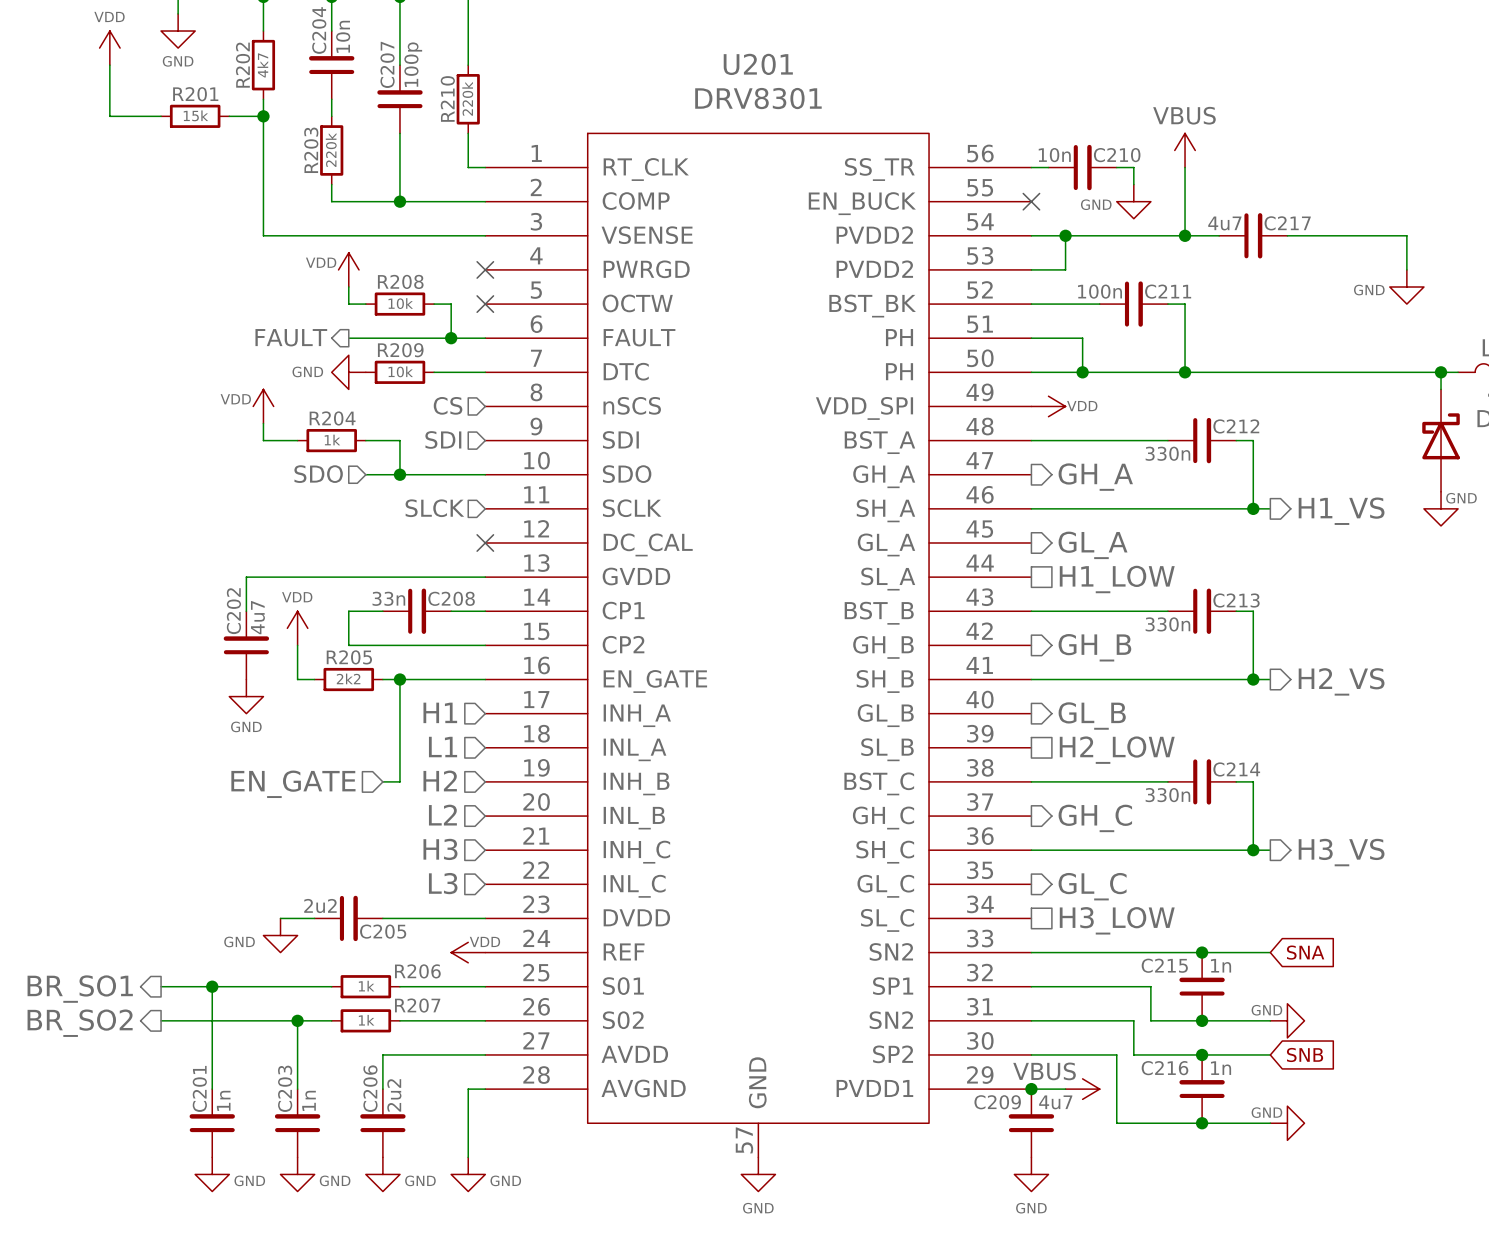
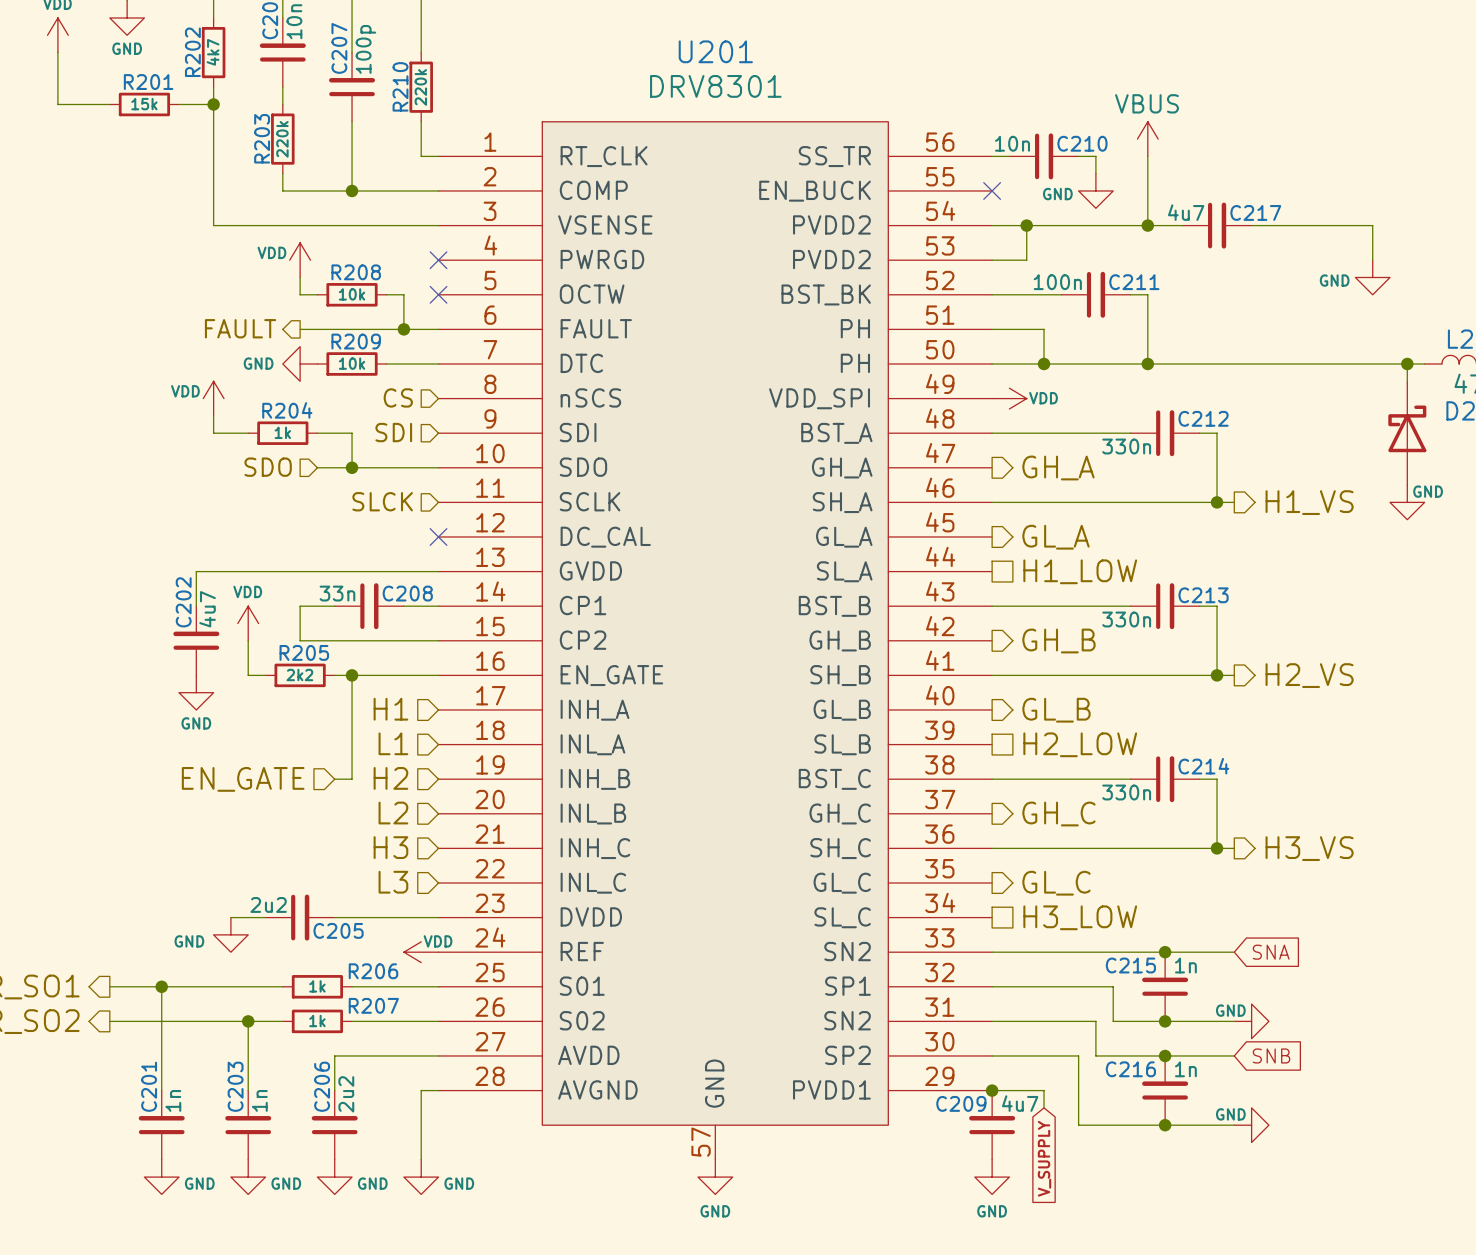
wire: none -> (1026, 1090) (1044, 1090) (1044, 1107)
power symbol: VBUS (1082, 1089) -> none
global label: none -> V_SUPPLY (1044, 1158)

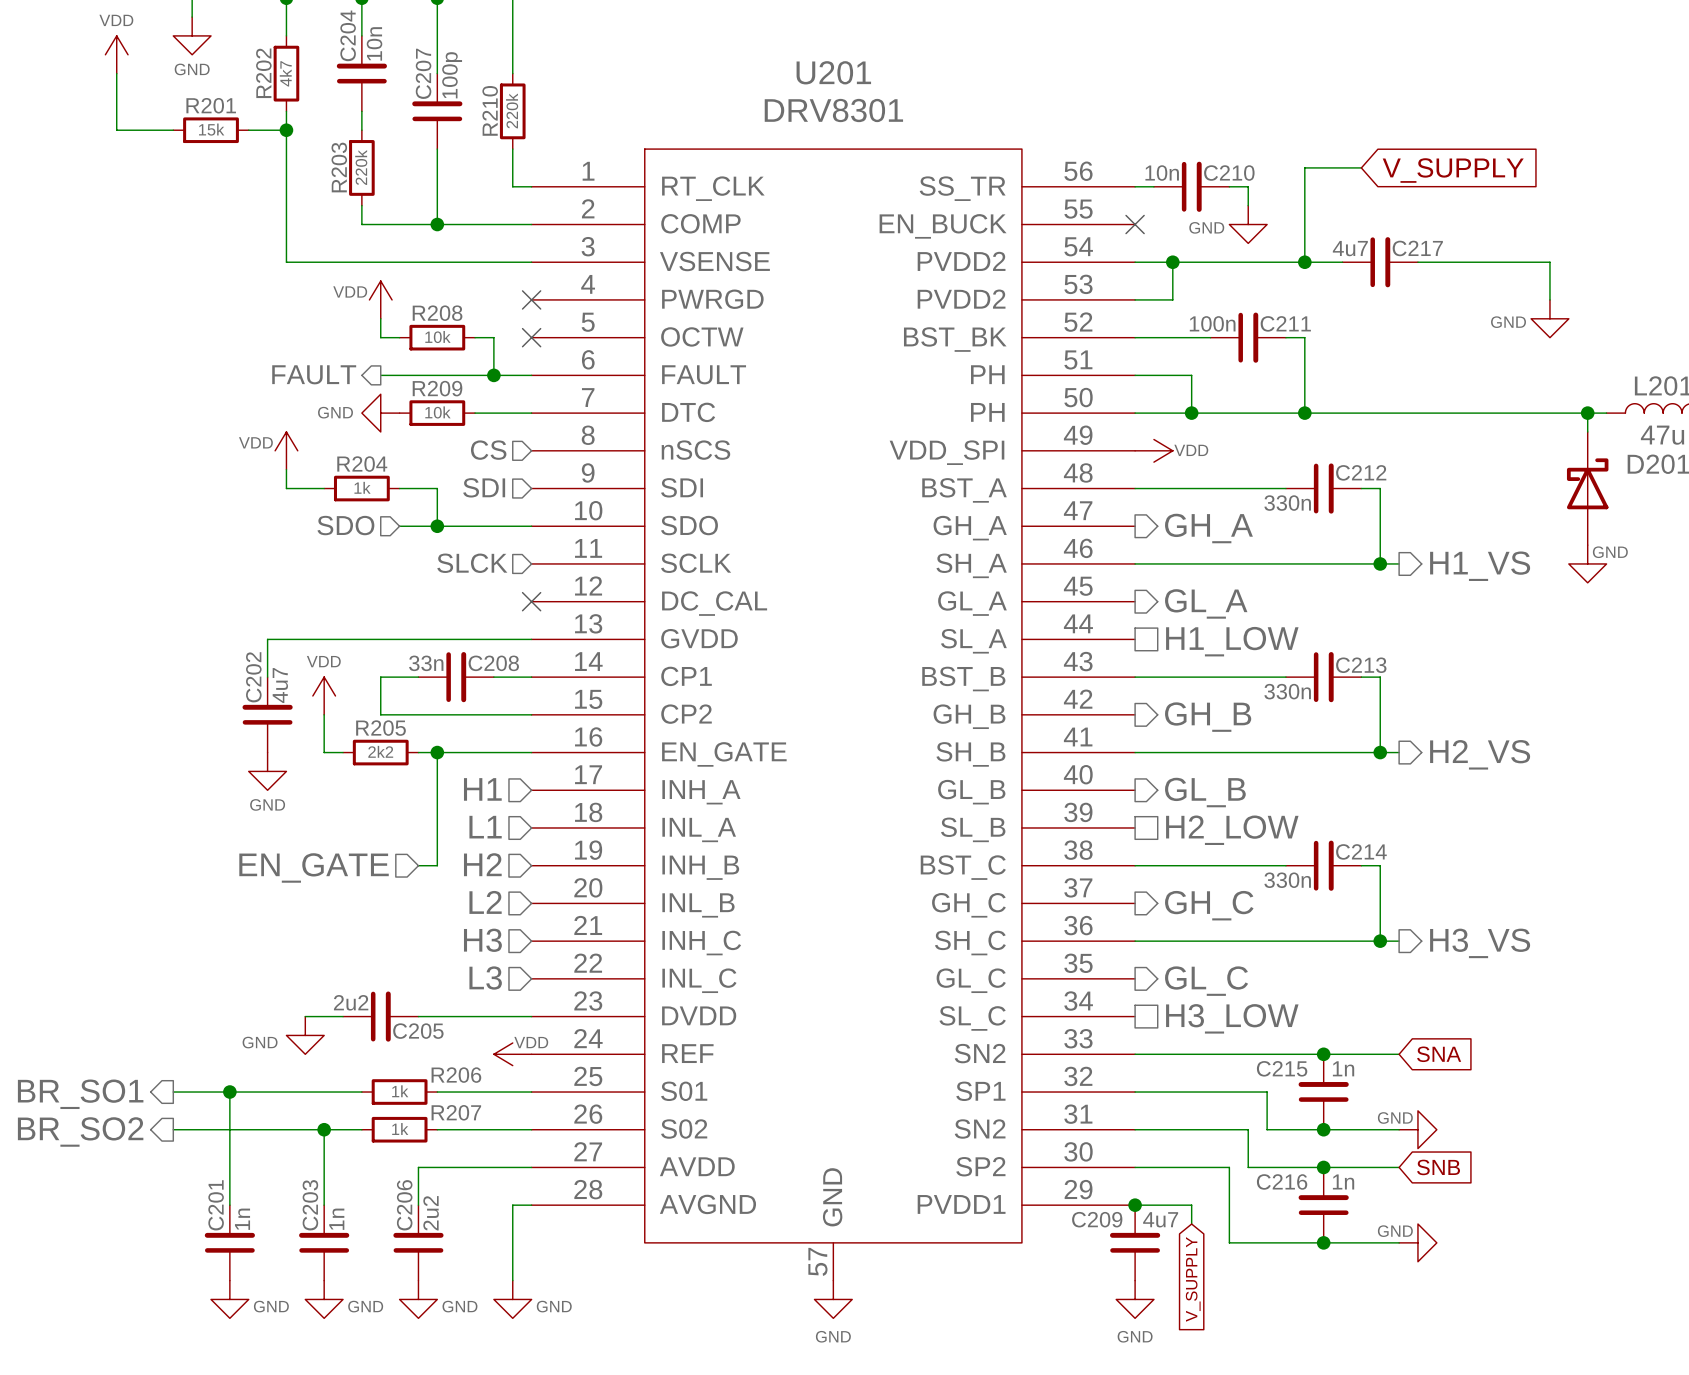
power symbol: VBUS (1147, 139) -> none
wire: none -> (1361, 167) (1304, 167) (1304, 186)
global label: none -> V_SUPPLY (1453, 170)

